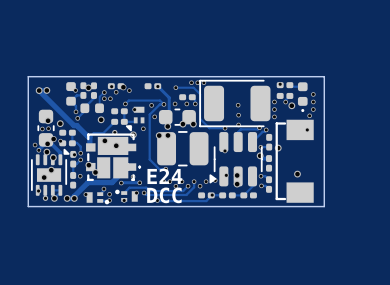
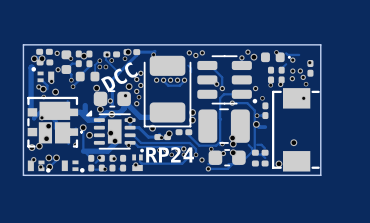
part footprint: [199, 79, 271, 128] -> [197, 55, 258, 105]
via: (191, 82) -> none
via: (197, 82) -> none
via: (203, 82) -> none
part: none -> (44, 51)
track: none -> (106, 51) (106, 60) (118, 72)
via: none -> (128, 52)
part: none -> (131, 52)
track: none -> (155, 51) (136, 52) (136, 55) (112, 79) (112, 104)
via: none -> (247, 52)
via: none -> (189, 52)
via: none -> (202, 52)
via: none -> (57, 53)
part: (285, 85) -> none
part: (152, 86) -> none
track: (157, 86) (169, 97) (167, 126) -> none
via: (123, 87) -> none
track: (175, 87) (193, 87) (200, 94) (200, 118) (209, 128) (225, 128) -> none
via: (175, 87) -> none
via: none -> (195, 55)
via: none -> (253, 57)
via: none -> (241, 57)
track: (39, 90) (88, 137) (93, 133) (103, 133) (114, 121) -> none
via: none -> (292, 60)
part: none -> (44, 62)
part: (285, 95) -> none
part: (187, 97) -> none
track: none -> (207, 65) (210, 65) (222, 77) (222, 88)
part rotation: 0° (302, 97) -> 90° counterclockwise (275, 57)
part position: (302, 97) -> (275, 57)
track: none -> (32, 67) (32, 112)
part: none -> (310, 68)
via: none -> (58, 69)
via: (274, 101) -> none
via: (313, 101) -> none
via: (285, 102) -> none
via: none -> (292, 71)
via: none -> (300, 71)
track: (125, 103) (128, 100) (160, 100) (163, 104) (159, 104) (149, 114) (149, 159) (159, 169) (165, 169) -> none
via: (125, 103) -> none
via: (175, 103) -> none
via: (186, 103) -> none
via: (195, 103) -> none
via: (163, 104) -> none
via: none -> (140, 73)
via: (151, 105) -> none
via: (238, 105) -> none
via: (291, 105) -> none
part: none -> (42, 74)
part: none -> (271, 75)
part: none -> (281, 75)
part footprint: [158, 108, 196, 126] -> [143, 55, 192, 128]
via: (134, 109) -> none
via: (274, 109) -> none
via: none -> (303, 77)
via: (313, 109) -> none
via: none -> (292, 78)
track: none -> (40, 80) (47, 85) (47, 89)
part: (119, 111) -> none
track: (124, 111) (124, 121) (135, 120) -> none
via: none -> (136, 79)
via: none -> (156, 80)
track: none -> (163, 80) (168, 85) (179, 85) (184, 80)
via: none -> (163, 80)
via: none -> (170, 80)
via: none -> (177, 80)
via: none -> (184, 80)
via: none -> (51, 81)
via: none -> (216, 84)
via: (238, 115) -> none
via: (154, 116) -> none
via: none -> (280, 84)
via: none -> (140, 85)
via: none -> (38, 86)
part footprint: [111, 118, 128, 125] -> [93, 90, 131, 108]
via: none -> (129, 86)
part: (135, 119) -> none
part footprint: [275, 119, 314, 203] -> [272, 88, 320, 172]
via: none -> (222, 88)
via: none -> (255, 88)
via: none -> (136, 91)
via: (182, 124) -> none
via: (193, 124) -> none
via: (238, 124) -> none
track: none -> (241, 94) (223, 94) (220, 98) (220, 141) (216, 145) (199, 145) (188, 135) (188, 132)
via: (167, 126) -> none
track: (259, 127) (240, 129) (238, 132) (238, 142) -> none
via: (259, 127) -> none
part: (46, 128) -> none
via: (225, 128) -> none
via: (42, 129) -> none
track: (266, 129) (252, 142) -> none
track: none -> (124, 98) (124, 108) (119, 112) (106, 112) (99, 120) (88, 120) (80, 112) (73, 112)
part: (67, 132) -> none
track: none -> (124, 100) (140, 117) (162, 117) (167, 112)
part footprint: [209, 132, 263, 187] -> [198, 108, 250, 144]
part footprint: [86, 133, 142, 182] -> [86, 110, 136, 150]
via: (133, 134) -> none
track: none -> (232, 103) (247, 103) (254, 110) (255, 152)
via: none -> (232, 103)
via: none -> (136, 103)
via: (159, 135) -> none
via: (167, 135) -> none
via: (53, 139) -> none
via: (60, 141) -> none
track: (73, 142) (76, 142) (80, 146) (80, 153) -> none
via: (47, 143) -> none
part: (67, 143) -> none
via: none -> (192, 112)
via: (35, 145) -> none
part: (182, 148) -> none
via: (278, 148) -> none
via: none -> (41, 117)
via: (38, 150) -> none
via: (225, 150) -> none
track: none -> (130, 120) (130, 127) (139, 127) (148, 137) (157, 137) (159, 133)
via: none -> (130, 120)
via: none -> (192, 120)
via: (46, 152) -> none
part: none -> (55, 122)
via: (80, 153) -> none
via: (74, 154) -> none
part: (73, 159) -> none
via: (80, 159) -> none
track: none -> (83, 127) (83, 150) (91, 158)
via: none -> (83, 127)
via: none -> (152, 128)
part: none -> (183, 132)
part: (269, 163) -> none
via: none -> (110, 133)
via: (88, 165) -> none
via: none -> (169, 133)
via: none -> (89, 135)
track: none -> (130, 135) (133, 135) (141, 143) (189, 143) (195, 149) (195, 156)
part: none -> (162, 137)
via: none -> (232, 138)
part: (50, 172) -> none
via: (95, 172) -> none
via: none -> (115, 141)
track: none -> (130, 142) (134, 142) (138, 146) (181, 146) (183, 148)
text: E24 (164, 176) -> RP24 (170, 154)
via: (261, 176) -> none
via: none -> (31, 147)
part: (73, 180) -> none
via: none -> (183, 148)
via: (206, 181) -> none
track: (88, 182) (74, 198) (67, 198) -> none
track: (139, 182) (121, 183) -> none
via: (139, 182) -> none
via: (121, 183) -> none
via: none -> (223, 153)
part rotation: 0° (269, 184) -> 90° clockwise (260, 152)
via: (261, 185) -> none
track: (188, 186) (183, 191) (149, 191) (146, 187) (129, 187) (124, 193) -> none
via: none -> (48, 157)
via: none -> (56, 157)
part footprint: [115, 189, 138, 202] -> [120, 154, 127, 172]
track: none -> (238, 157) (227, 168) (208, 168)
via: none -> (114, 158)
part: none -> (138, 159)
via: none -> (201, 160)
part footprint: [86, 192, 110, 205] -> [88, 154, 95, 172]
via: (136, 192) -> none
via: (144, 192) -> none
part footprint: [219, 192, 236, 199] -> [208, 149, 246, 167]
via: (85, 194) -> none
part: none -> (101, 163)
via: (109, 194) -> none
part: none -> (112, 163)
text rotation: 0° (164, 195) -> 30° counterclockwise (119, 77)
text position: DCC (164, 195) -> DCC (119, 77)
part: (206, 195) -> none
track: (212, 195) (206, 201) (157, 200) -> none
via: (212, 195) -> none
part position: (248, 195) -> (260, 163)
via: none -> (278, 163)
via: none -> (135, 164)
part: none -> (39, 166)
part: none -> (73, 166)
via: (67, 198) -> none
via: (74, 198) -> none
via: (124, 200) -> none
via: (157, 200) -> none
via: none -> (208, 168)

